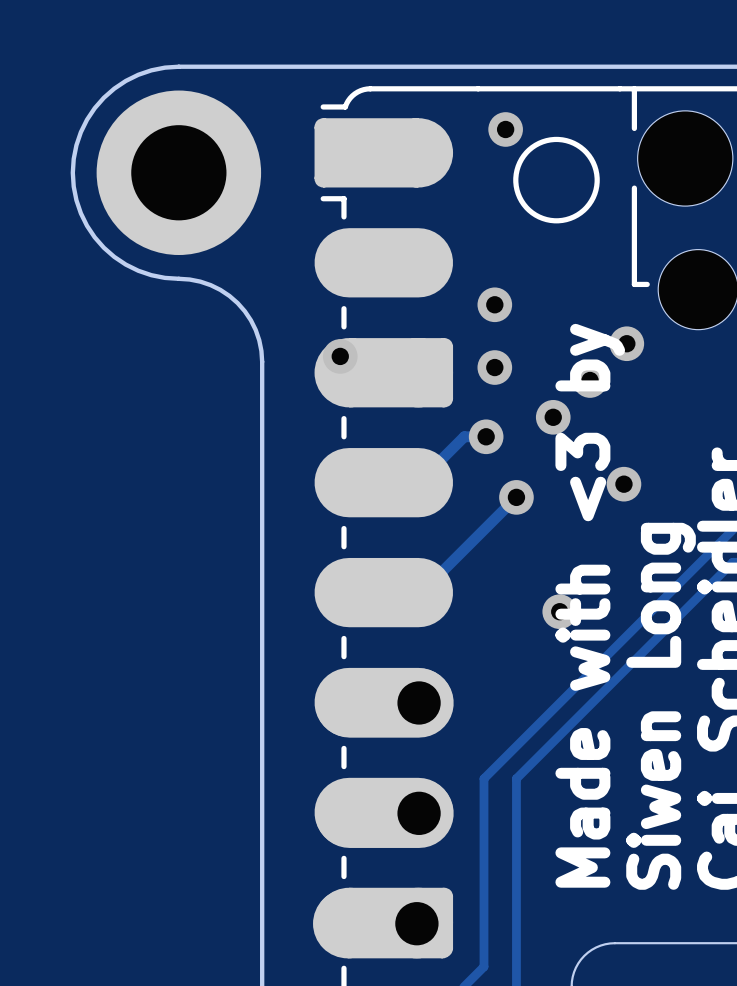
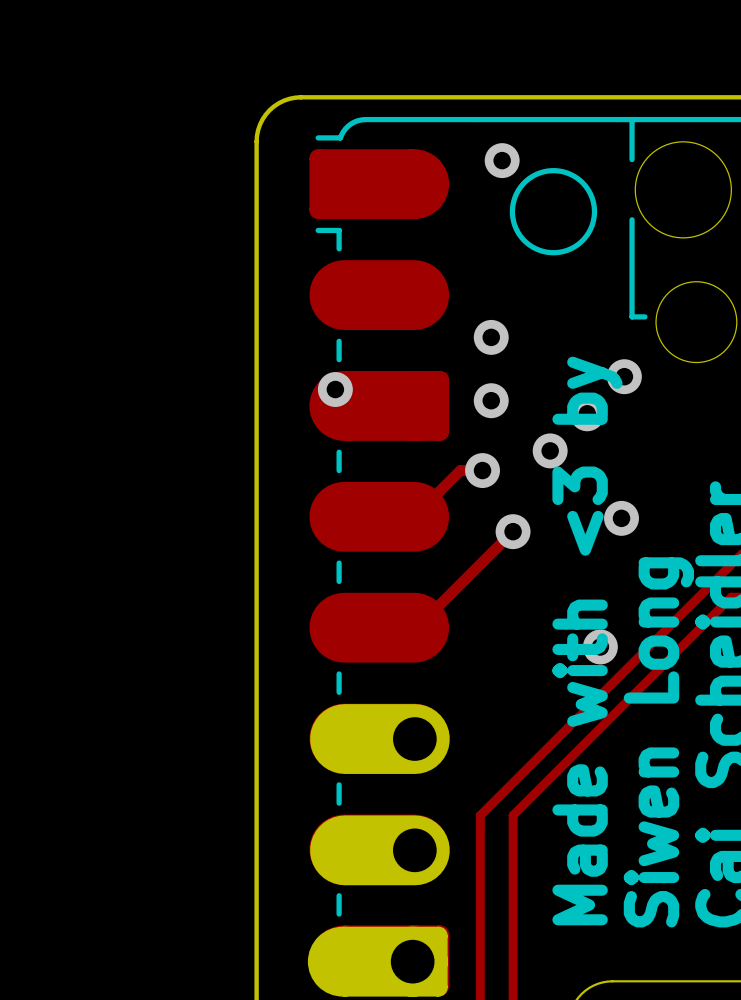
board edge: (306, 66) (178, 66) (151, 70) (138, 74) (114, 88) (94, 108) (80, 132) (73, 158) (72, 172) (76, 200) (87, 225) (103, 247) (114, 256) (138, 270) (165, 277) (200, 281) (229, 295) (244, 311) (255, 330) (262, 361) -> (300, 97) (289, 98) (273, 106) (262, 119) (256, 135) (256, 394)
part: (178, 172) -> none
via position: (559, 611) -> (600, 646)

